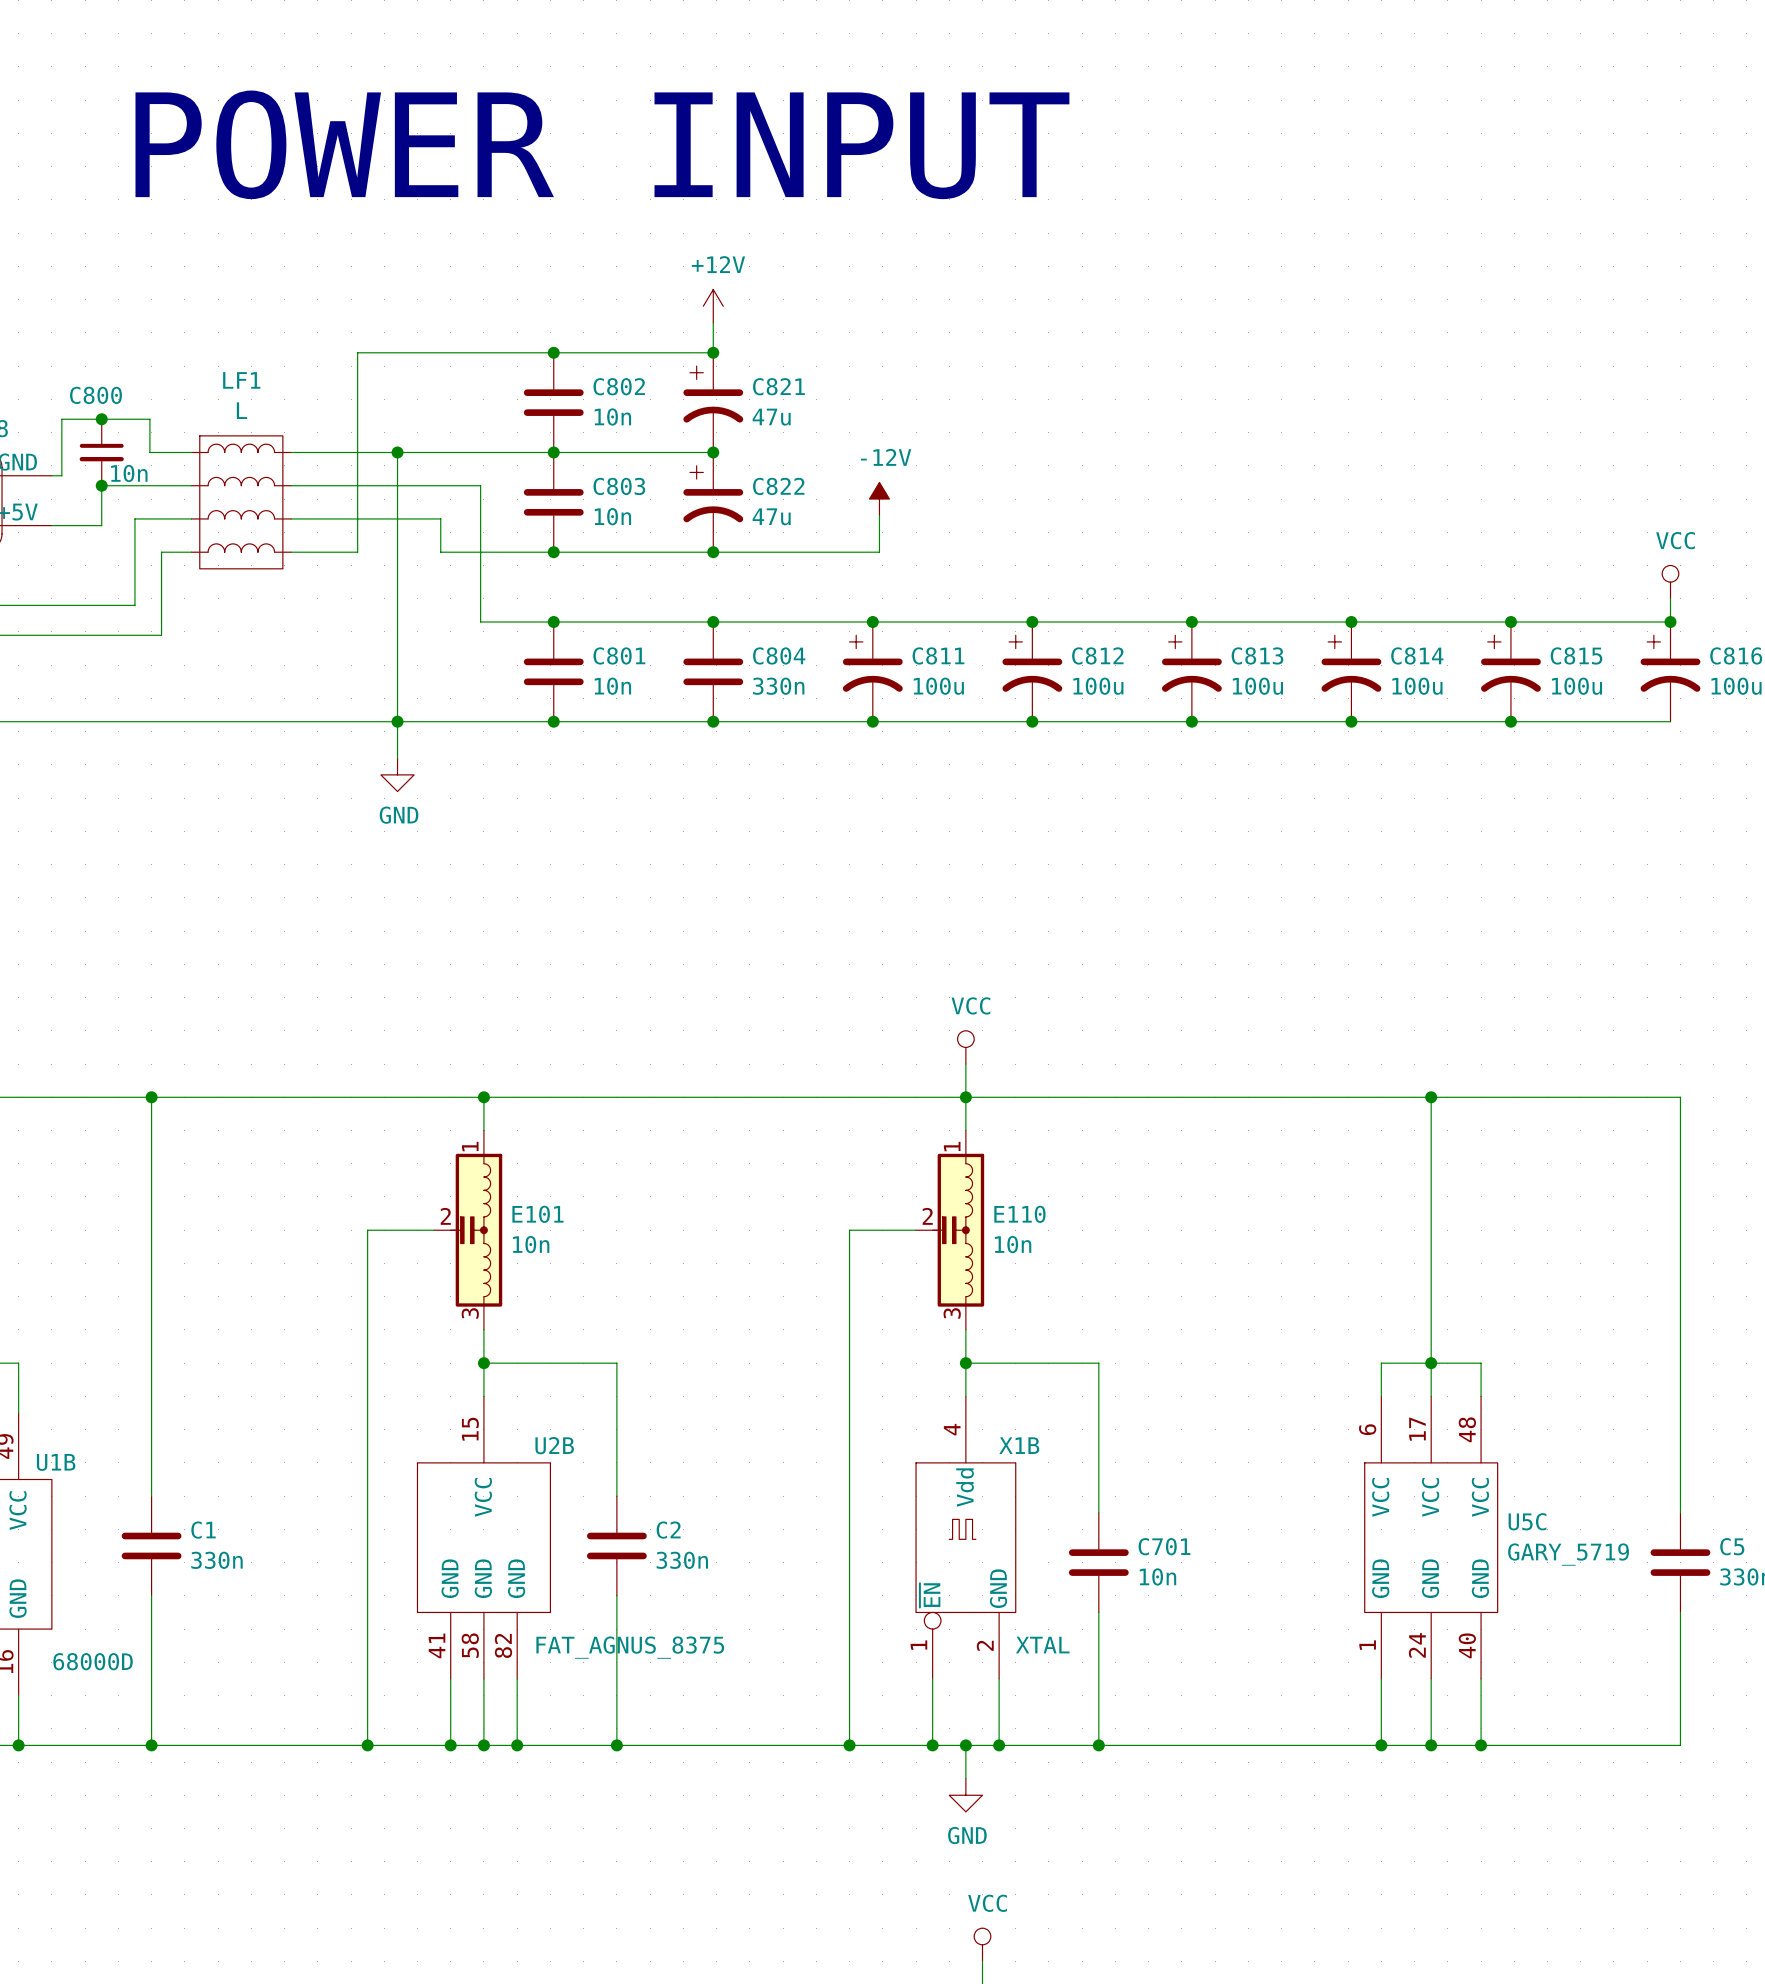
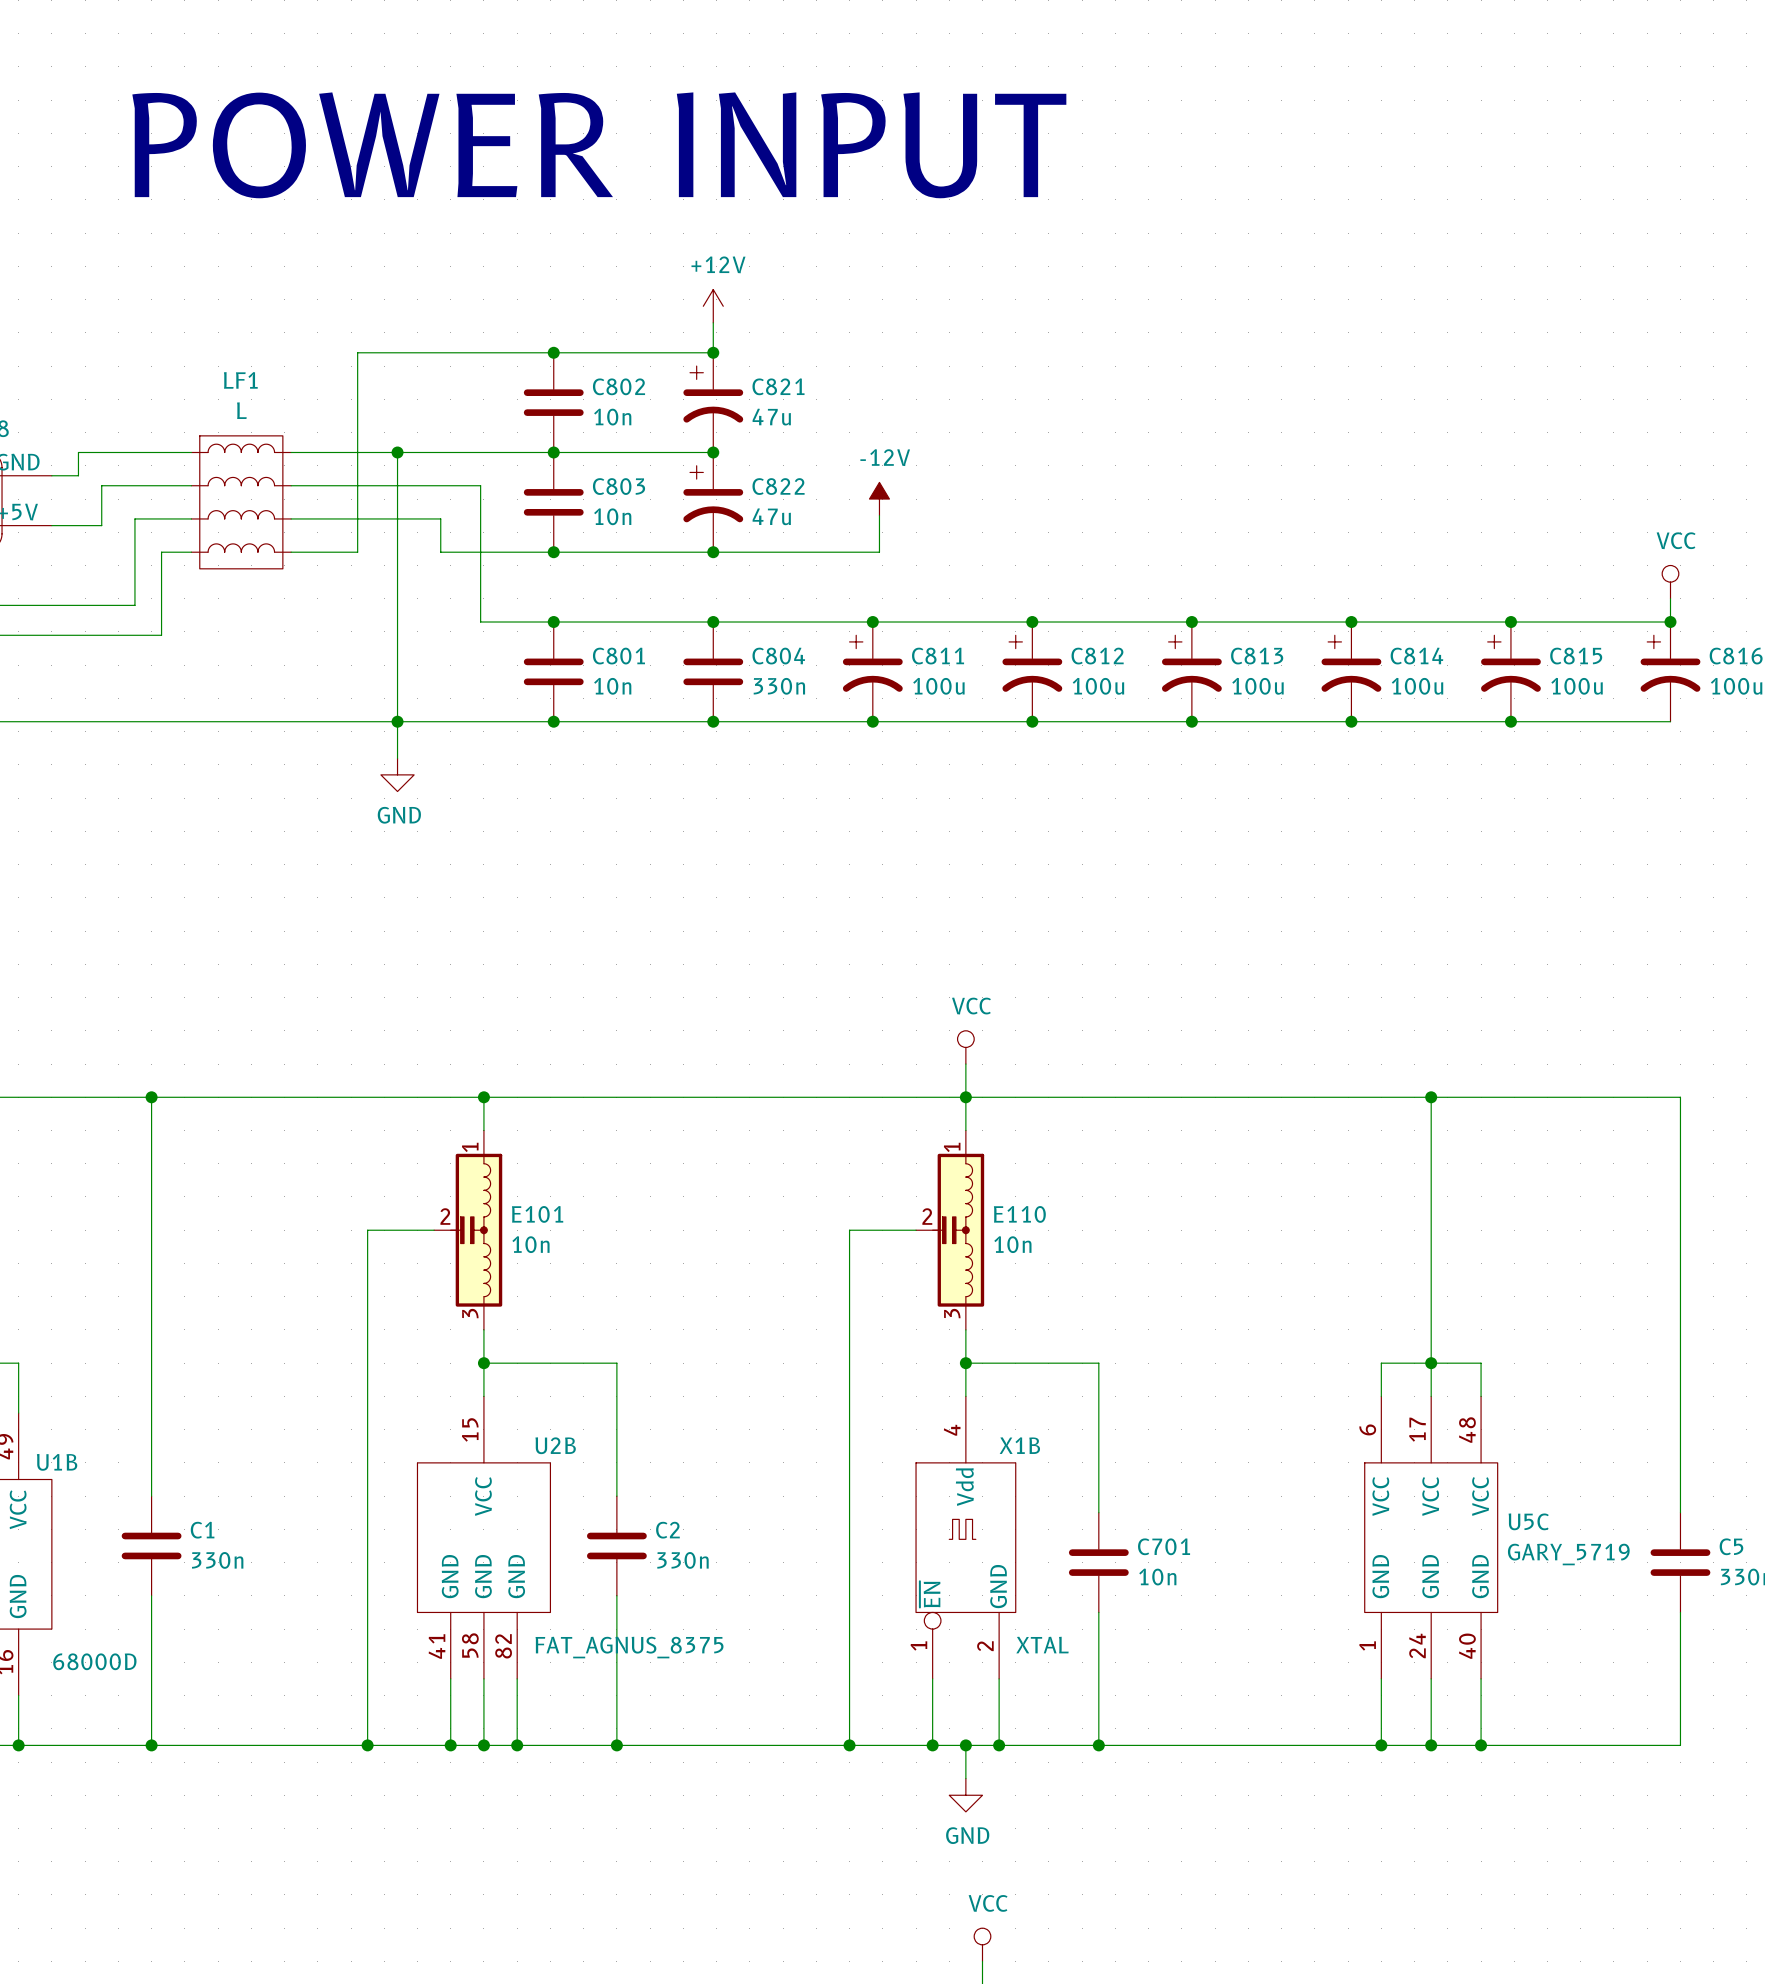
junction: (101, 419) -> none
C800: 10n (101, 452) -> none
wire: (149, 452) (149, 419) (61, 419) (61, 475) -> (149, 452) (78, 452) (78, 475) (61, 475)
junction: (101, 485) -> none

